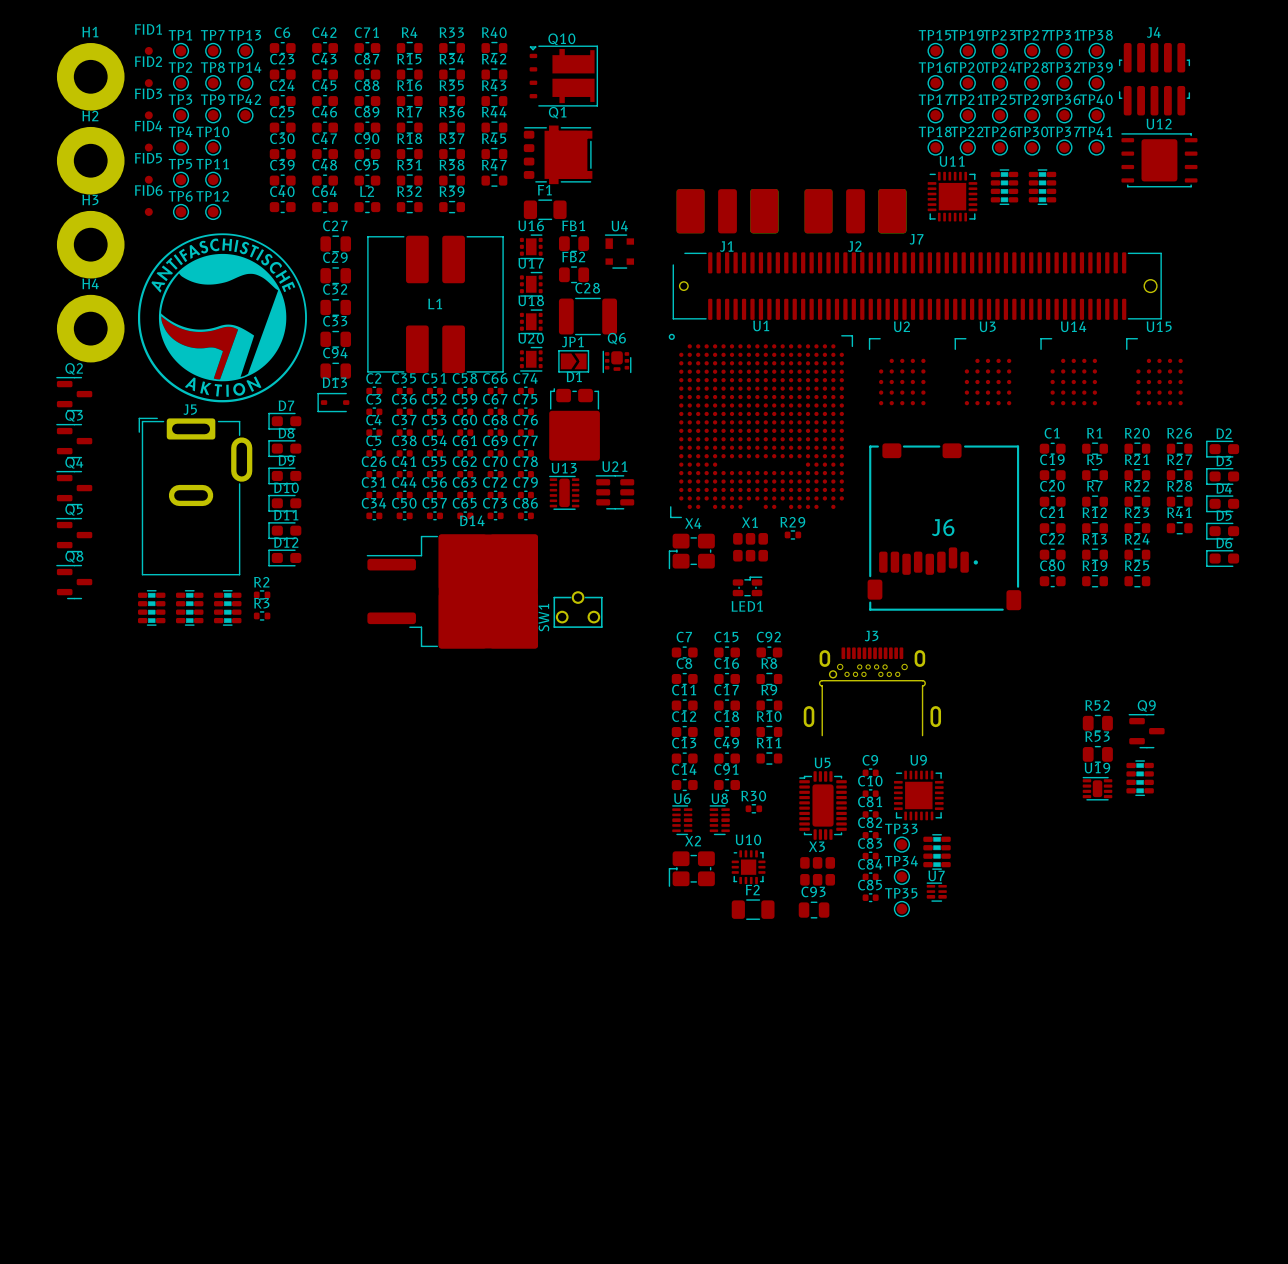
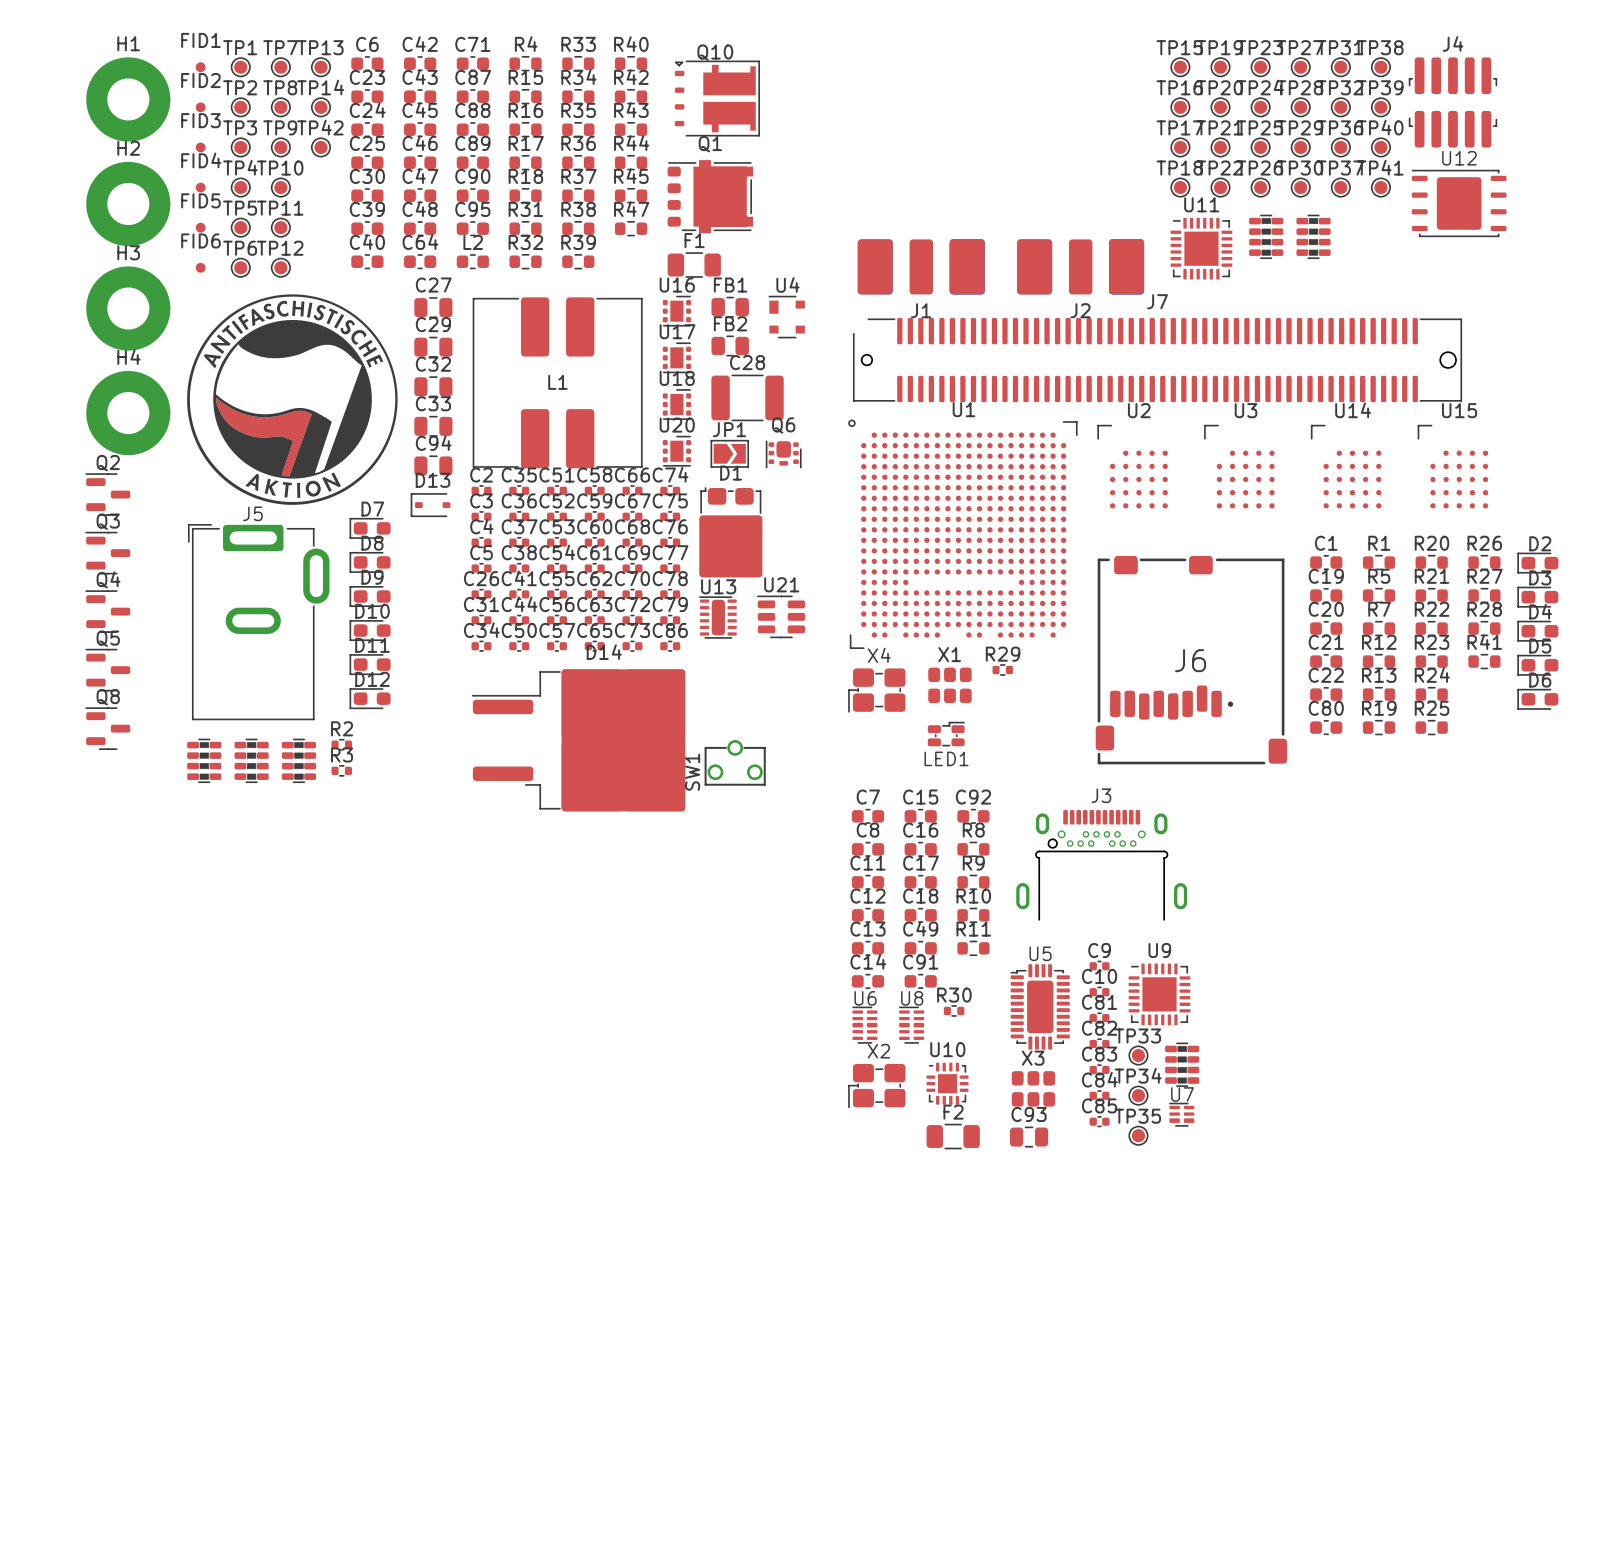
R52: (1097, 723) -> none
Q9: (1146, 731) -> none
R53: (1097, 754) -> none
part: (1140, 778) -> none
U19: (1097, 788) -> none

